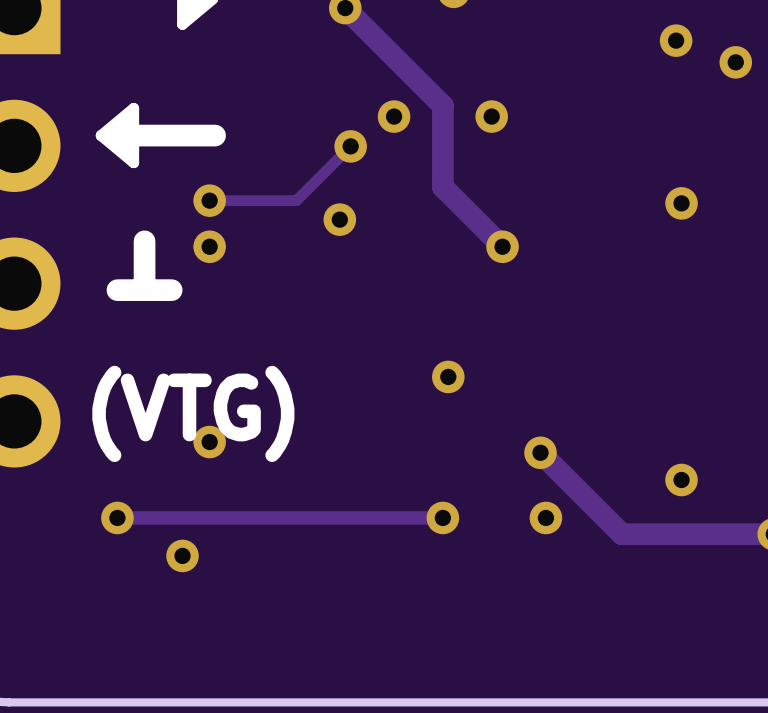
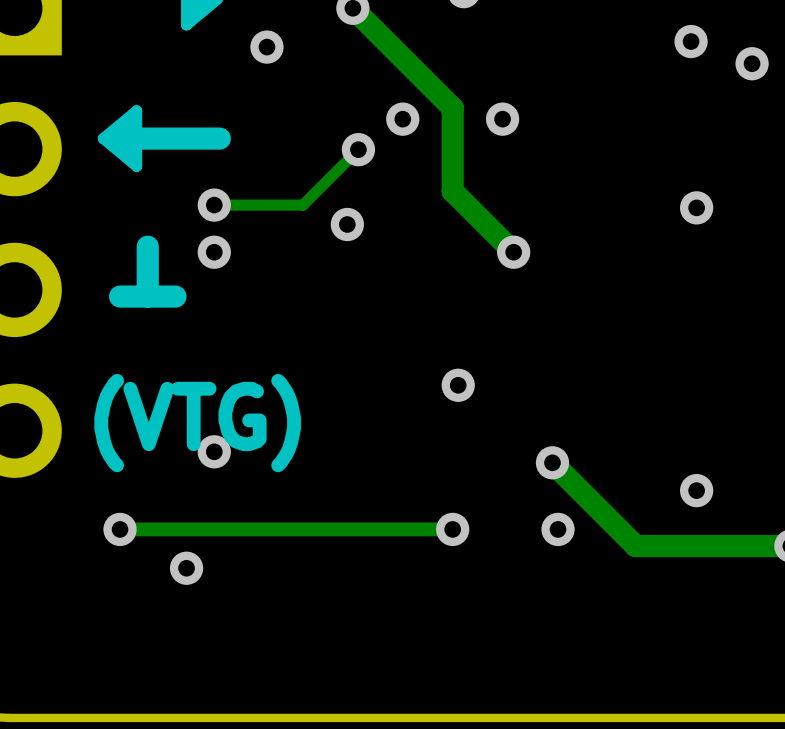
via: none -> (266, 47)

